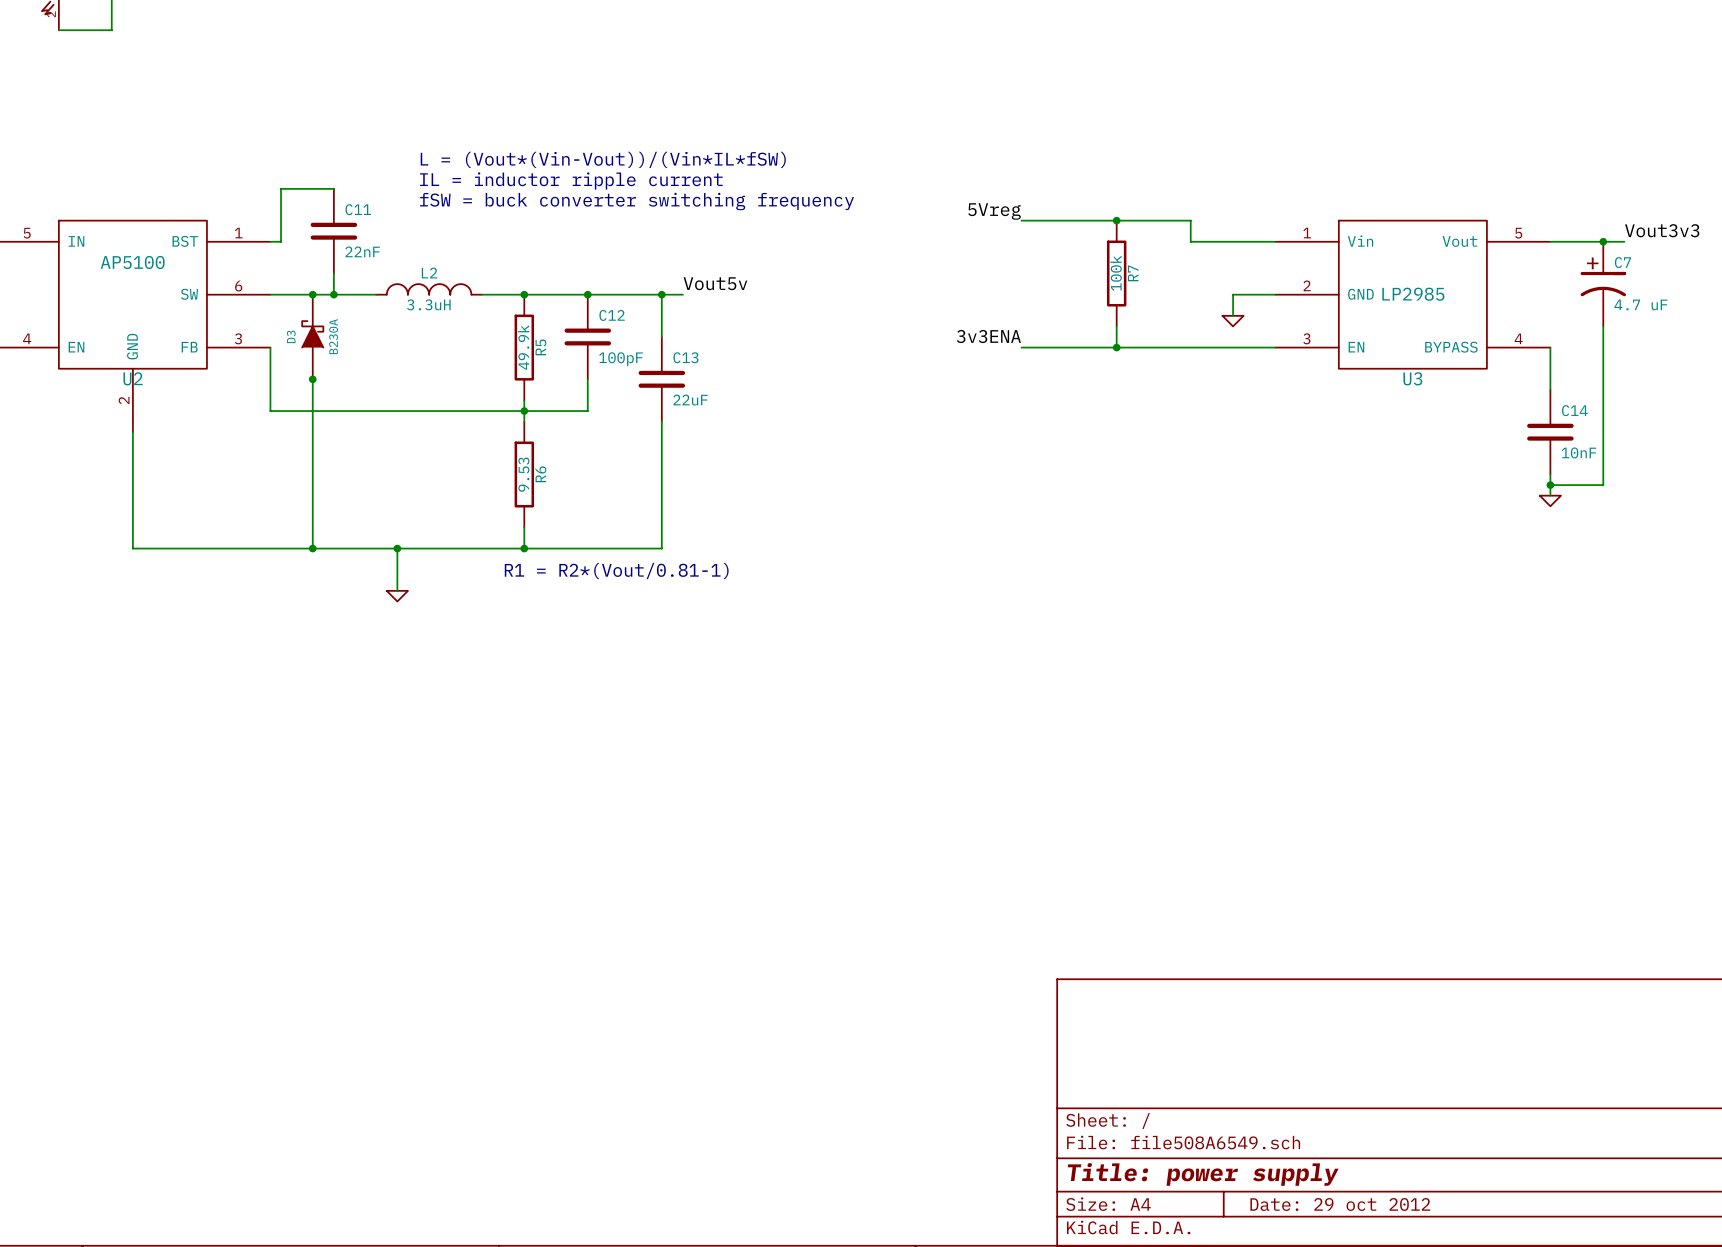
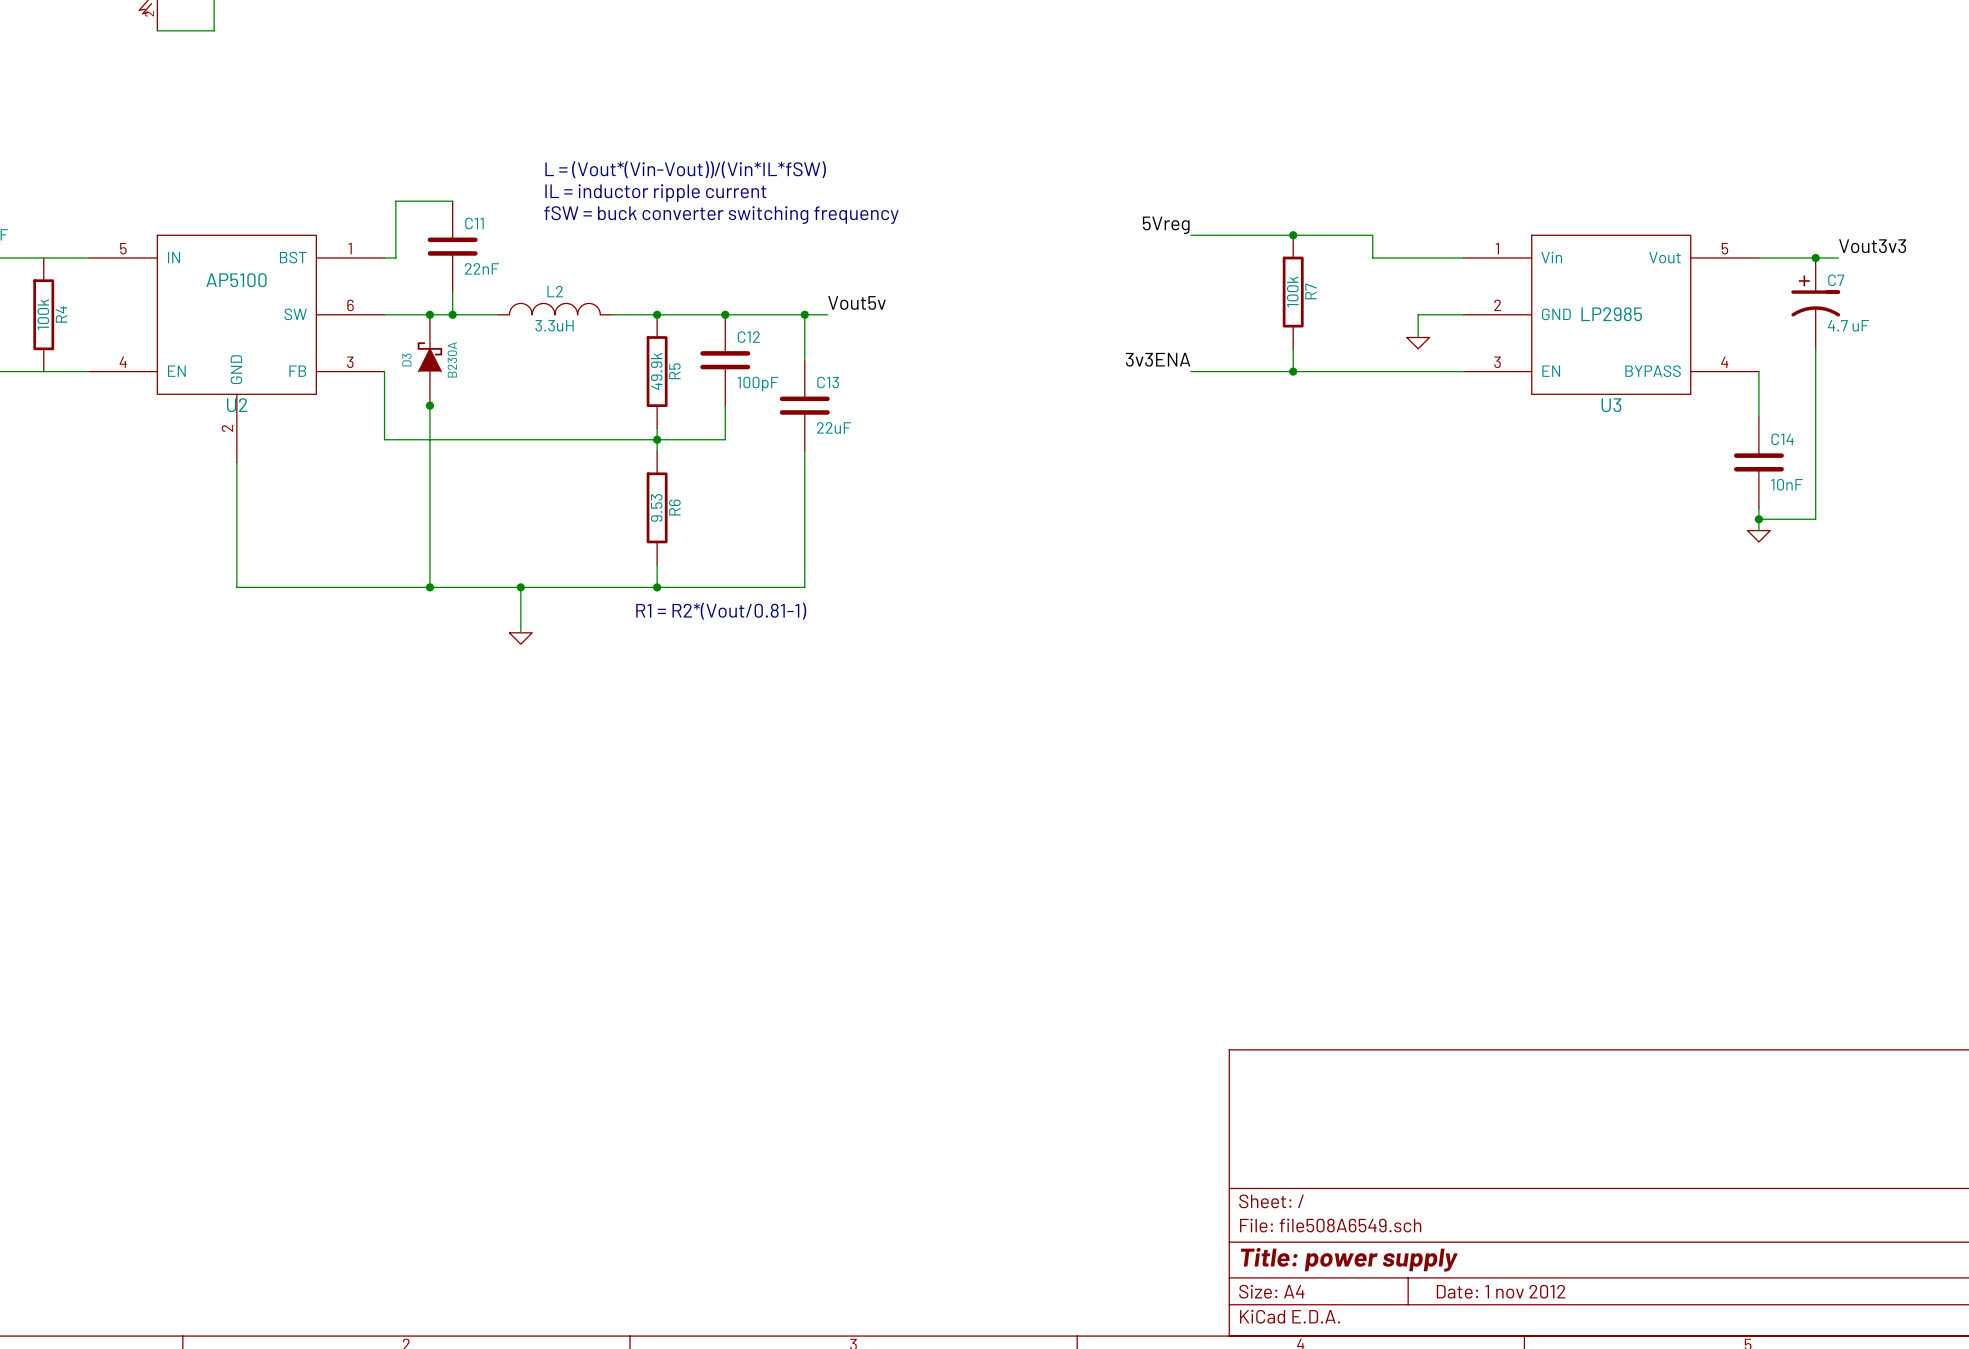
title block: Date: 29 oct 2012 (1340, 1204) -> Date: 1 nov 2012 (1501, 1291)

